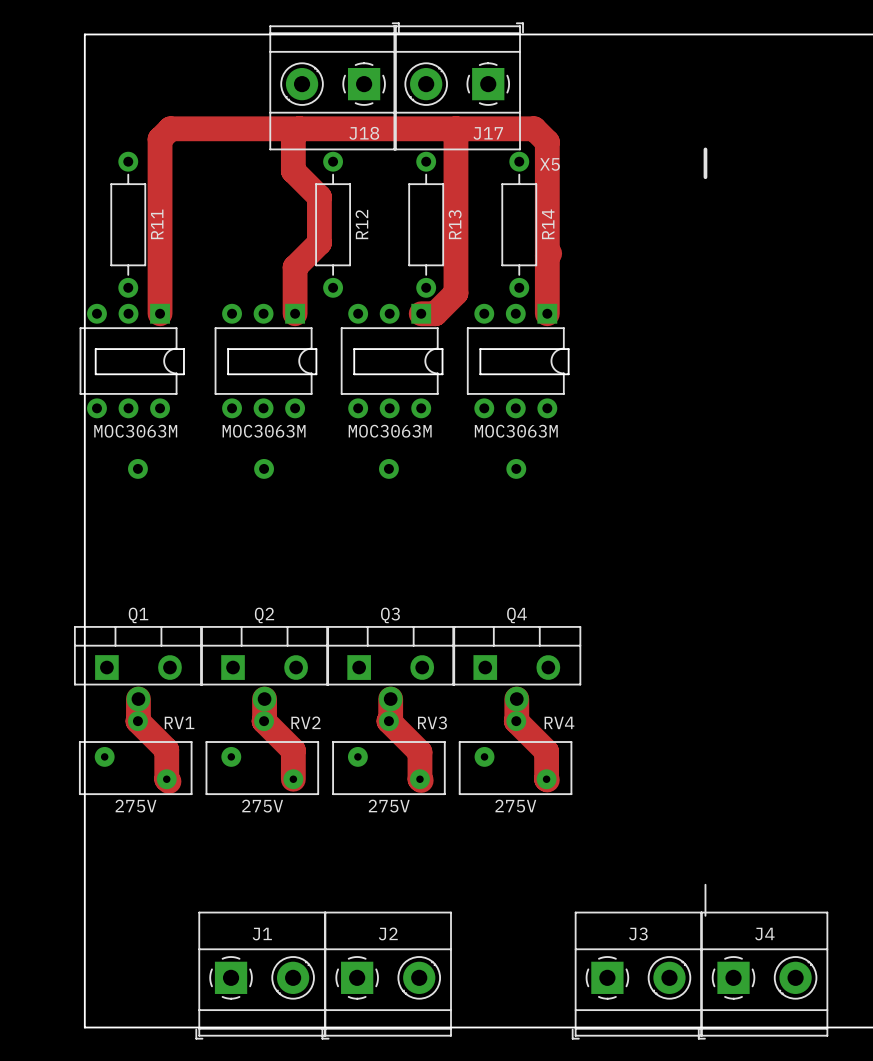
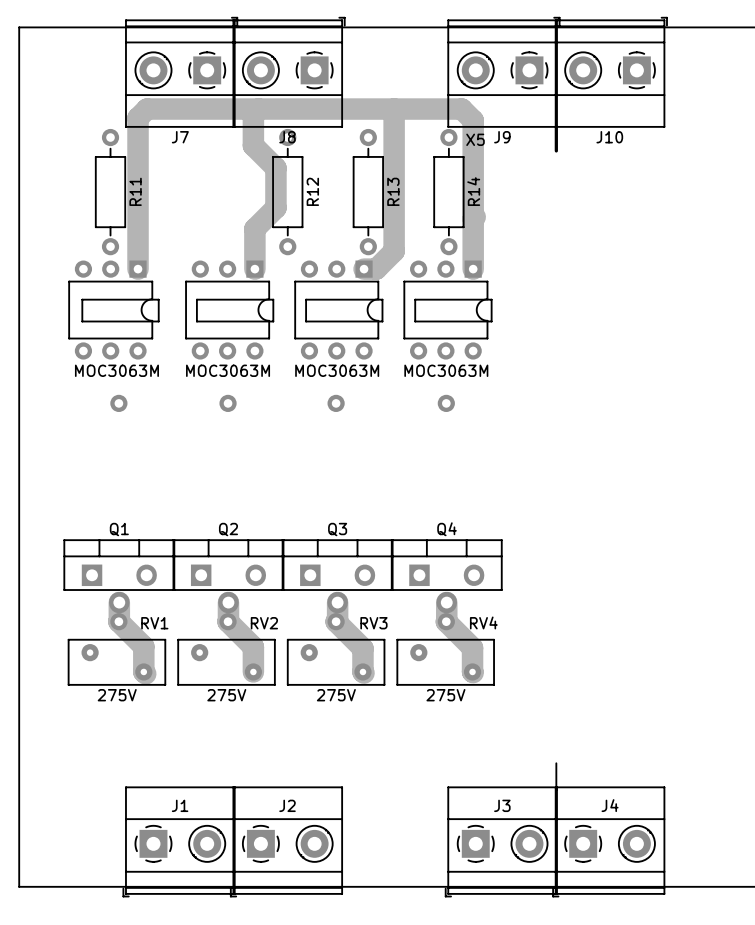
board edge: (84, 34) (84, 1027) -> (72, 27) (19, 27) (19, 886) (72, 886)
J7: none -> (181, 72)
J17: (458, 86) -> none
J9: none -> (503, 72)
J10: none -> (611, 72)
J18 name: J18 (364, 133) -> J8 (287, 137)
line: (705, 149) (705, 177) -> (556, 126) (556, 150)
line: (705, 884) (705, 915) -> (556, 763) (556, 790)
J1 position: (260, 975) -> (179, 841)
J2 position: (386, 975) -> (286, 841)
J3 position: (636, 975) -> (501, 841)
J4 position: (763, 975) -> (608, 841)

